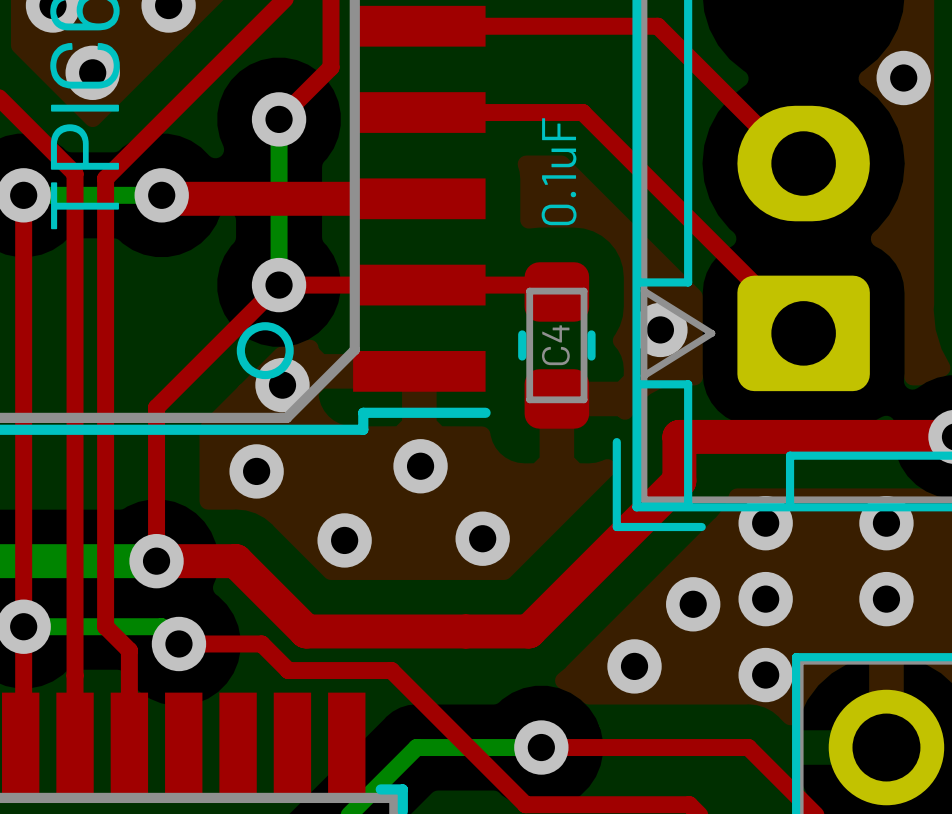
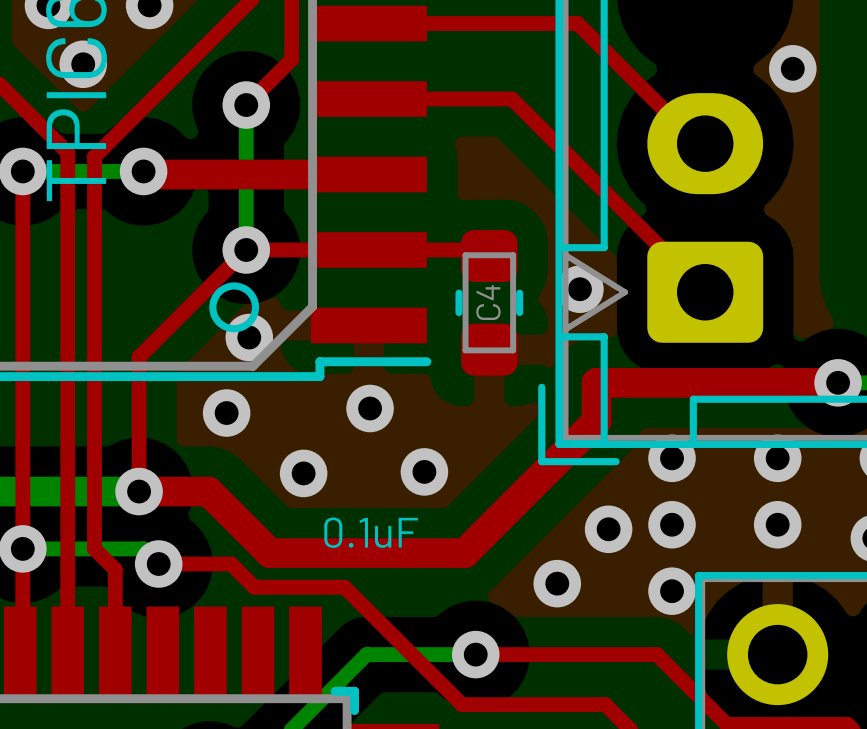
text: 0.1uF (559, 171) -> none
text: none -> 0.1uF (371, 532)

